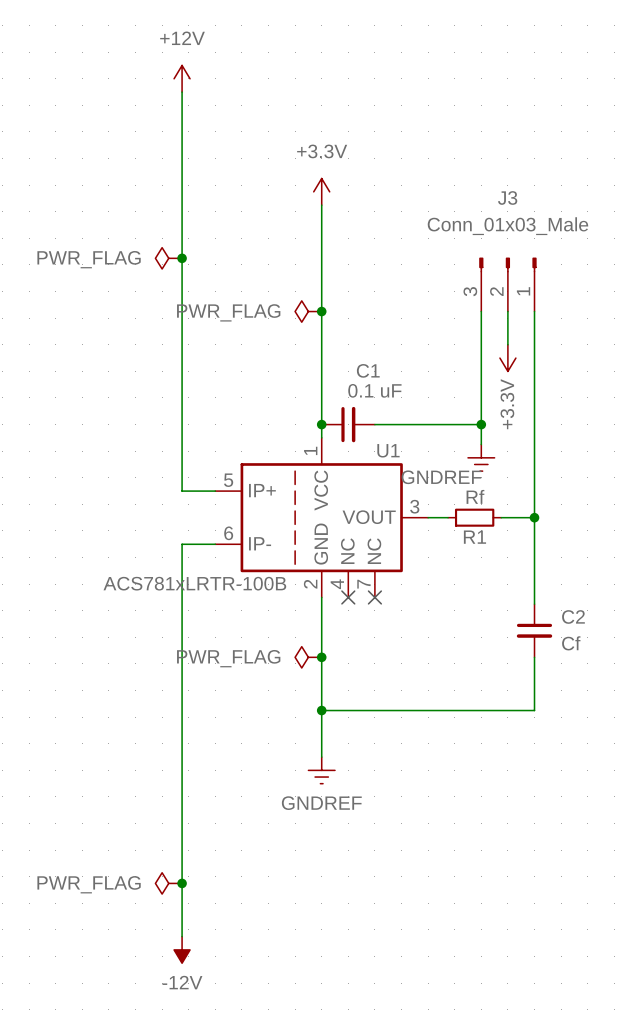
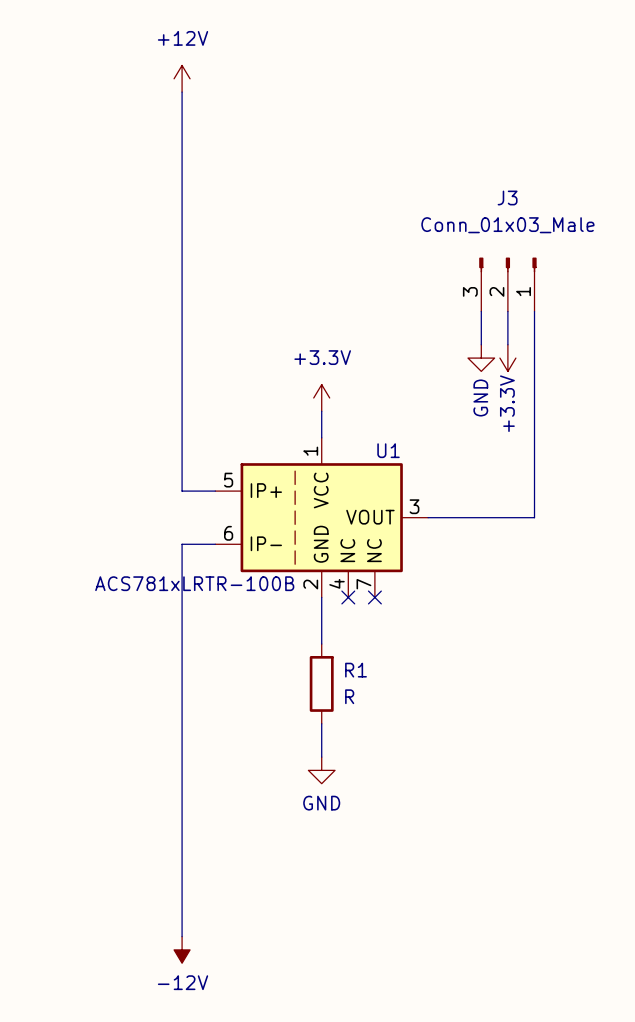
power symbol position: +3.3V (321, 191) -> +3.3V (321, 397)
wire: (321, 205) (321, 411) -> none
power symbol: PWR_FLAG (168, 258) -> none
junction: (182, 258) -> none
power symbol: PWR_FLAG (308, 311) -> none
junction: (321, 311) -> none
wire: (481, 344) (481, 444) -> none
power symbol: none -> GND (481, 358)
junction: (321, 424) -> none
C1: 0.1 uF (348, 424) -> none
wire: (374, 424) (481, 424) -> none
junction: (481, 424) -> none
power symbol: GNDREF (481, 457) -> none
R1 value: Rf (475, 496) -> R (349, 696)
R1 symbol: [448, 508, 502, 527] -> [309, 644, 334, 724]
wire: none -> (448, 517) (501, 517)
wire: (534, 517) (534, 604) -> none
junction: (534, 517) -> none
R1 name position: R1 (474, 537) -> R1 (356, 670)
C2: Cf (534, 630) -> none
wire: (321, 644) (321, 723) -> none
power symbol: PWR_FLAG (308, 657) -> none
junction: (321, 657) -> none
wire: (534, 657) (534, 710) (321, 710) -> none
junction: (321, 710) -> none
power symbol: GNDREF (321, 770) -> GND (321, 770)
power symbol: PWR_FLAG (168, 883) -> none
junction: (182, 883) -> none

